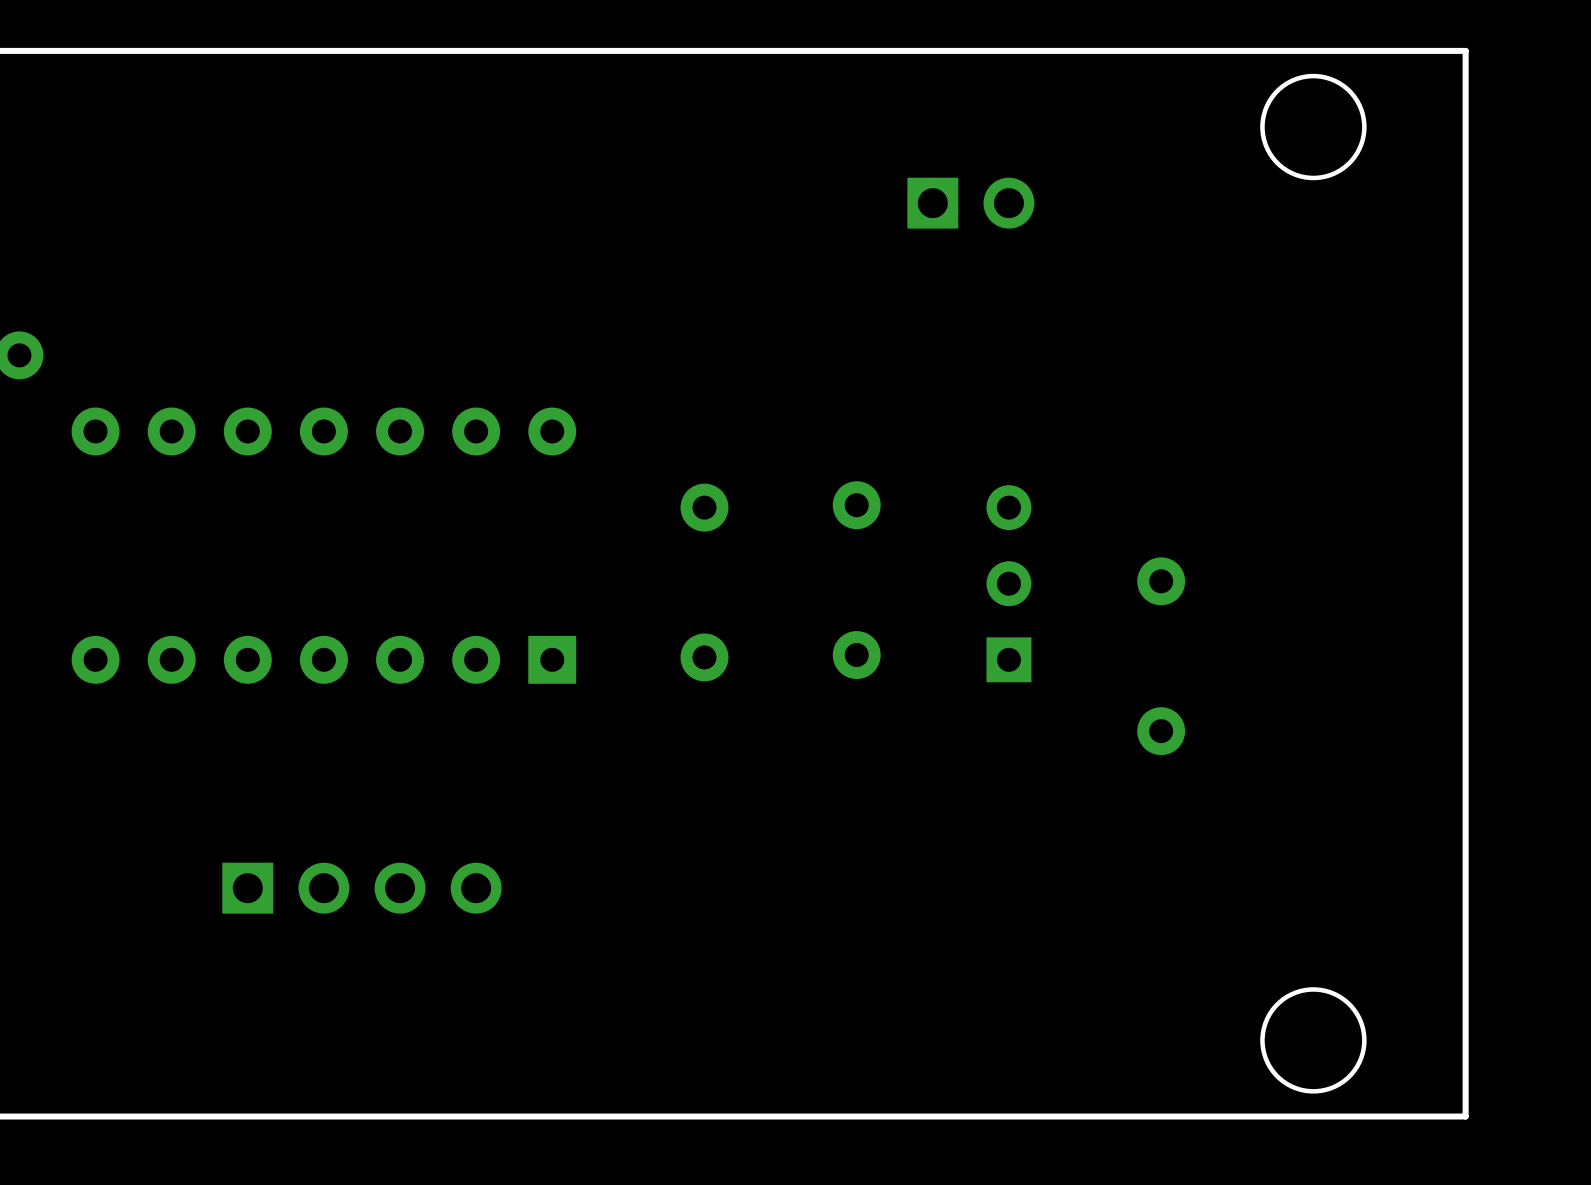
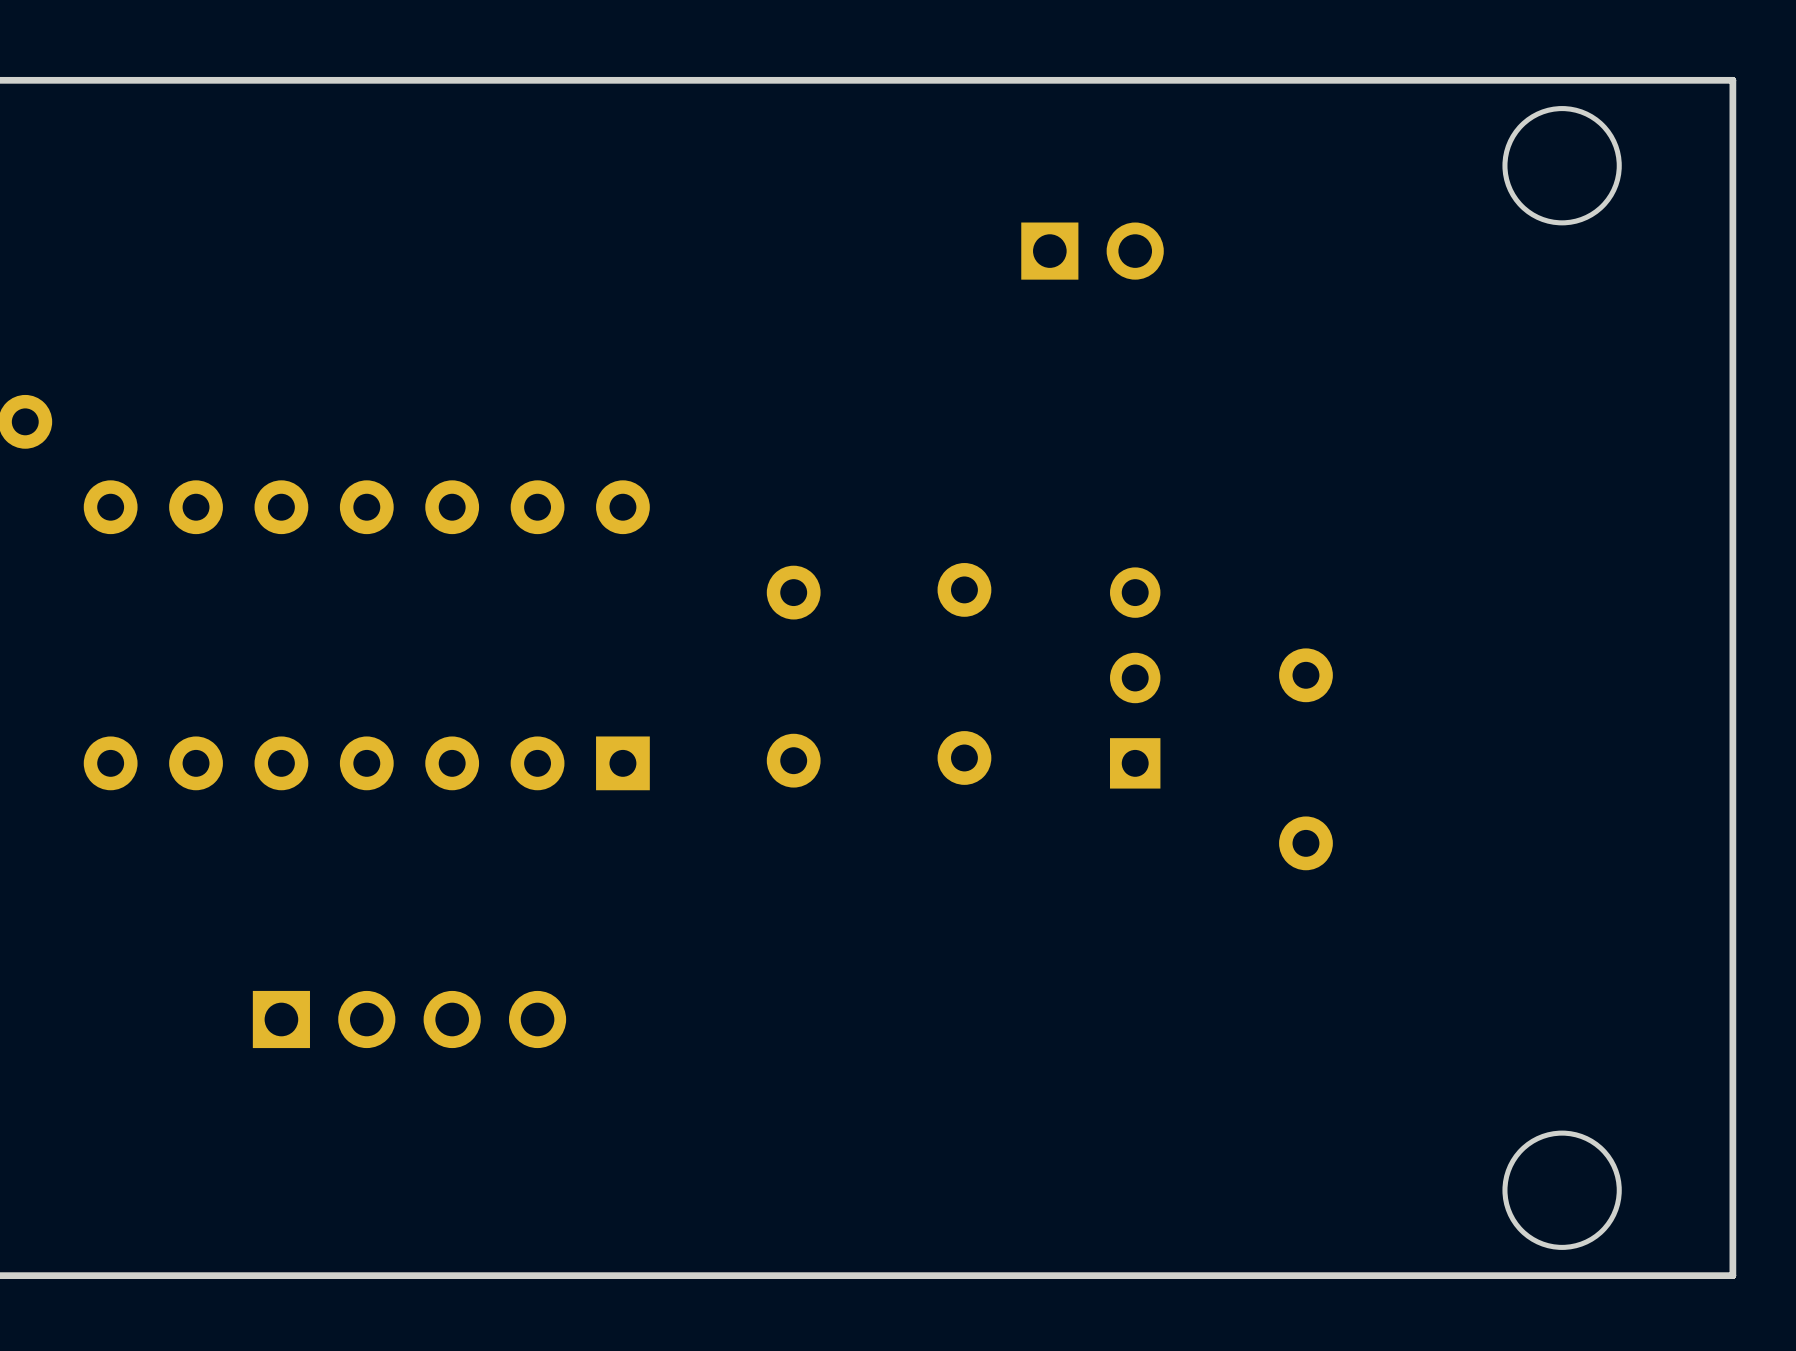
board edge: (1465, 50) (1465, 1116) -> (1647, 80) (1732, 80) (1732, 1275) (1647, 1275)
round board edge position: (1313, 127) -> (1562, 165)
round board edge position: (1313, 1040) -> (1562, 1190)

